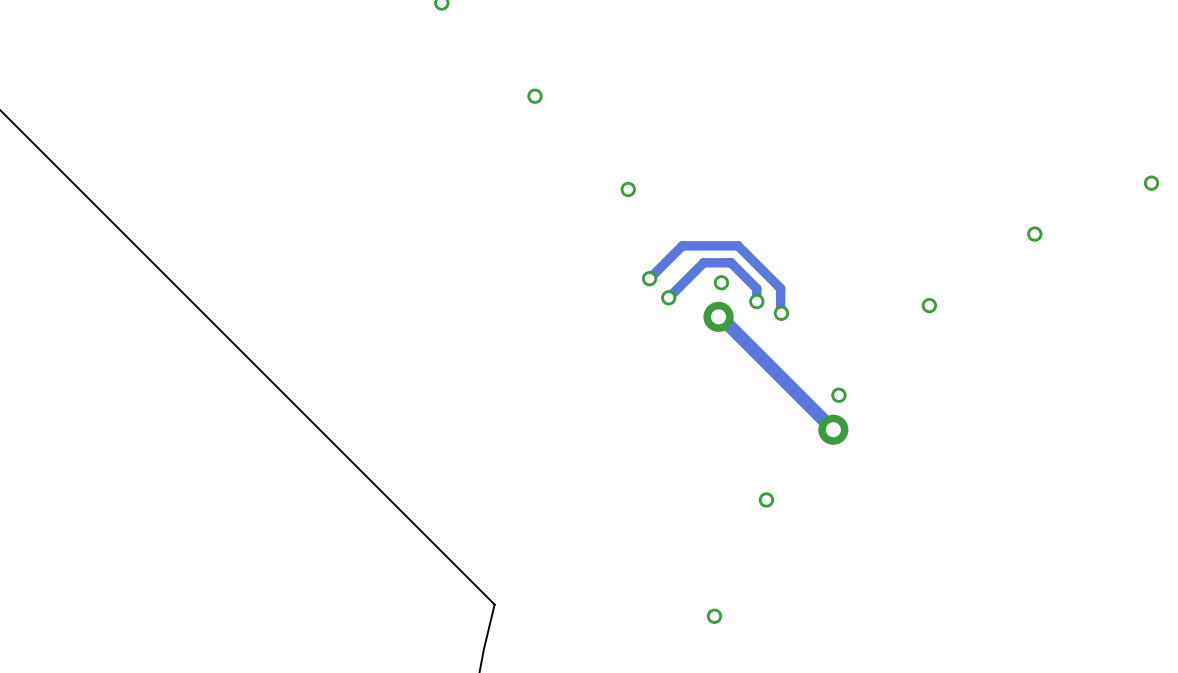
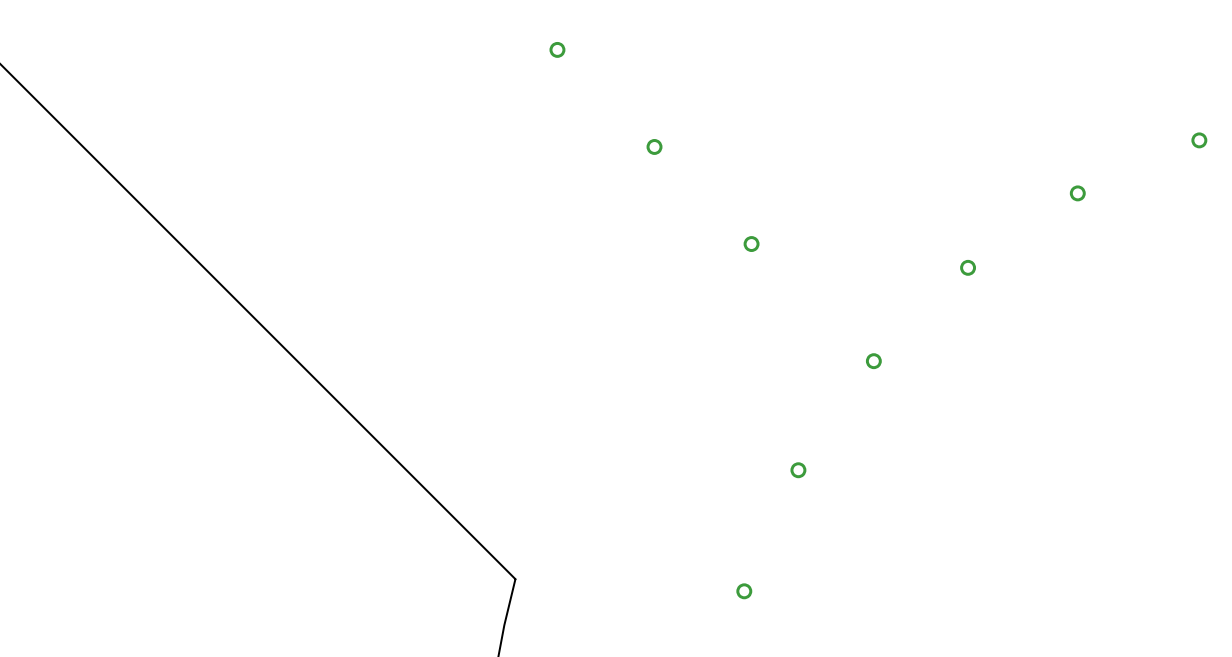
track: (649, 278) (682, 245) (738, 245) (780, 288) (780, 308) -> none
via: (649, 278) -> none
track: (668, 297) (703, 262) (731, 262) (756, 288) (756, 301) -> none
via: (668, 297) -> none
via: (756, 301) -> none
via: (781, 313) -> none
track: (718, 316) (833, 429) -> none
via: (718, 316) -> none
via: (833, 429) -> none

